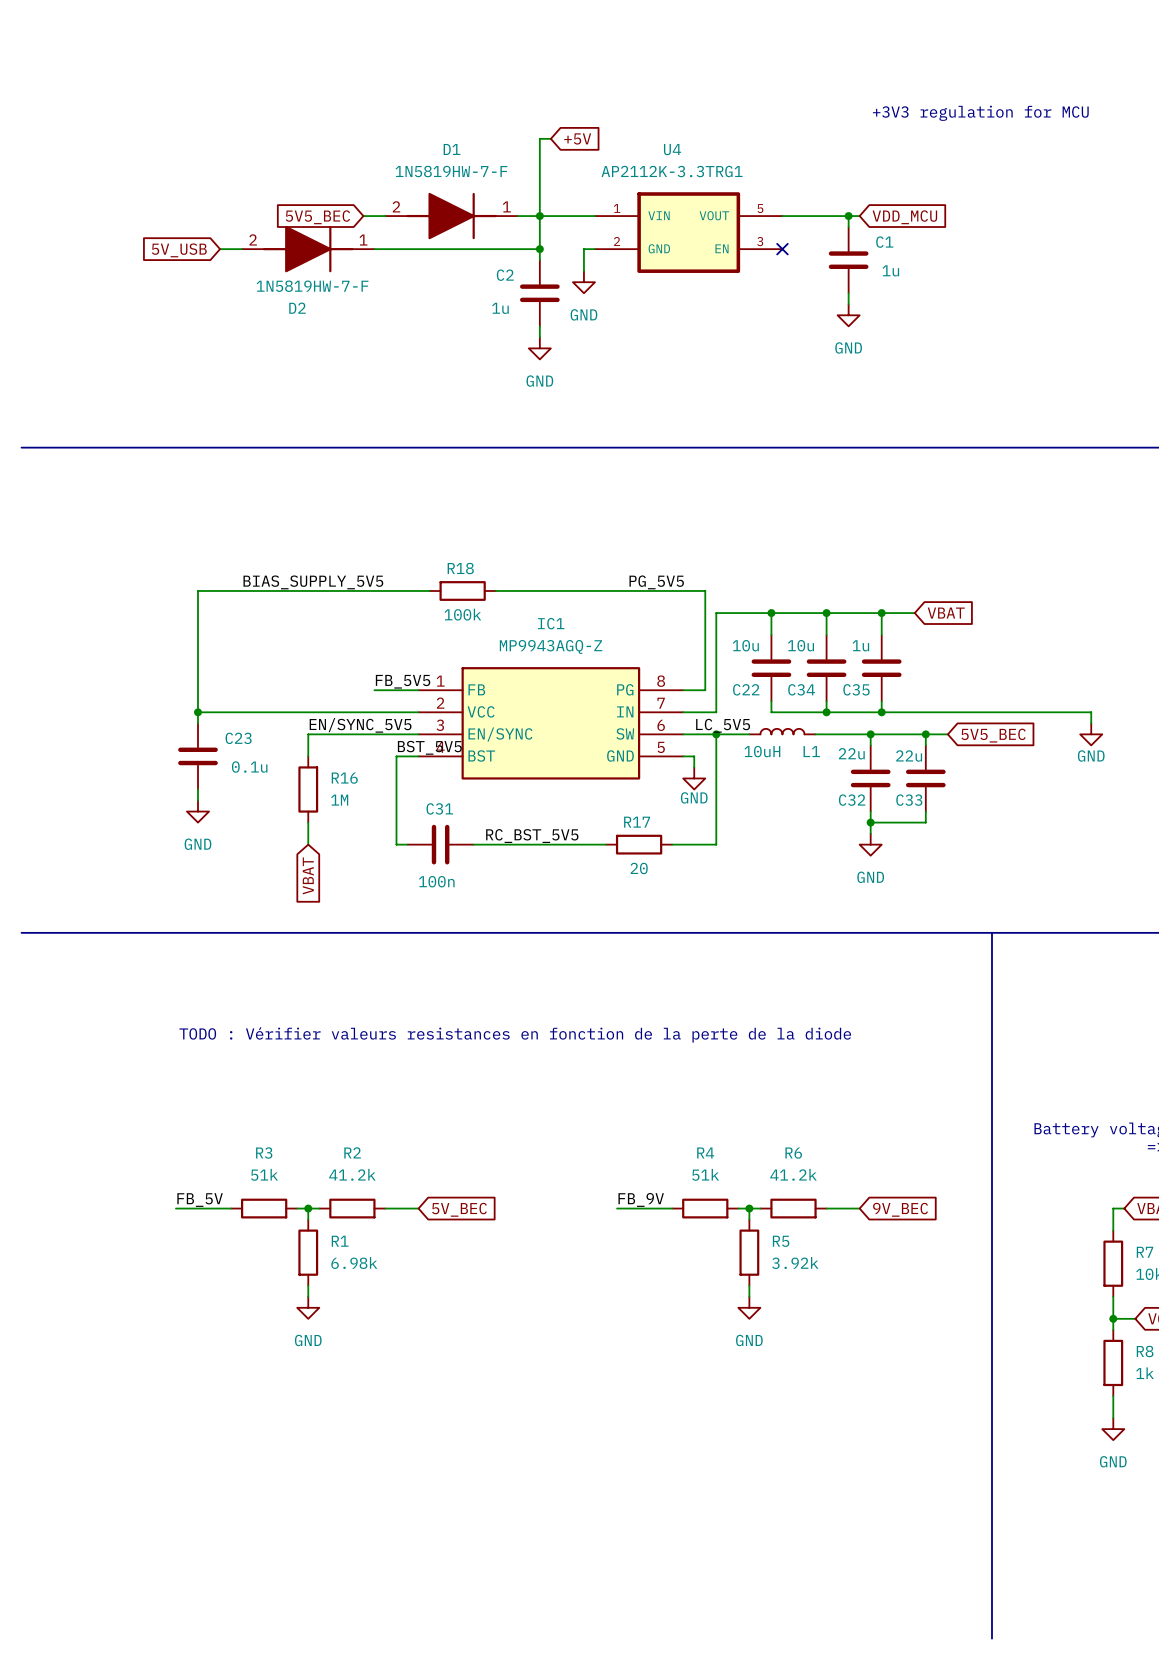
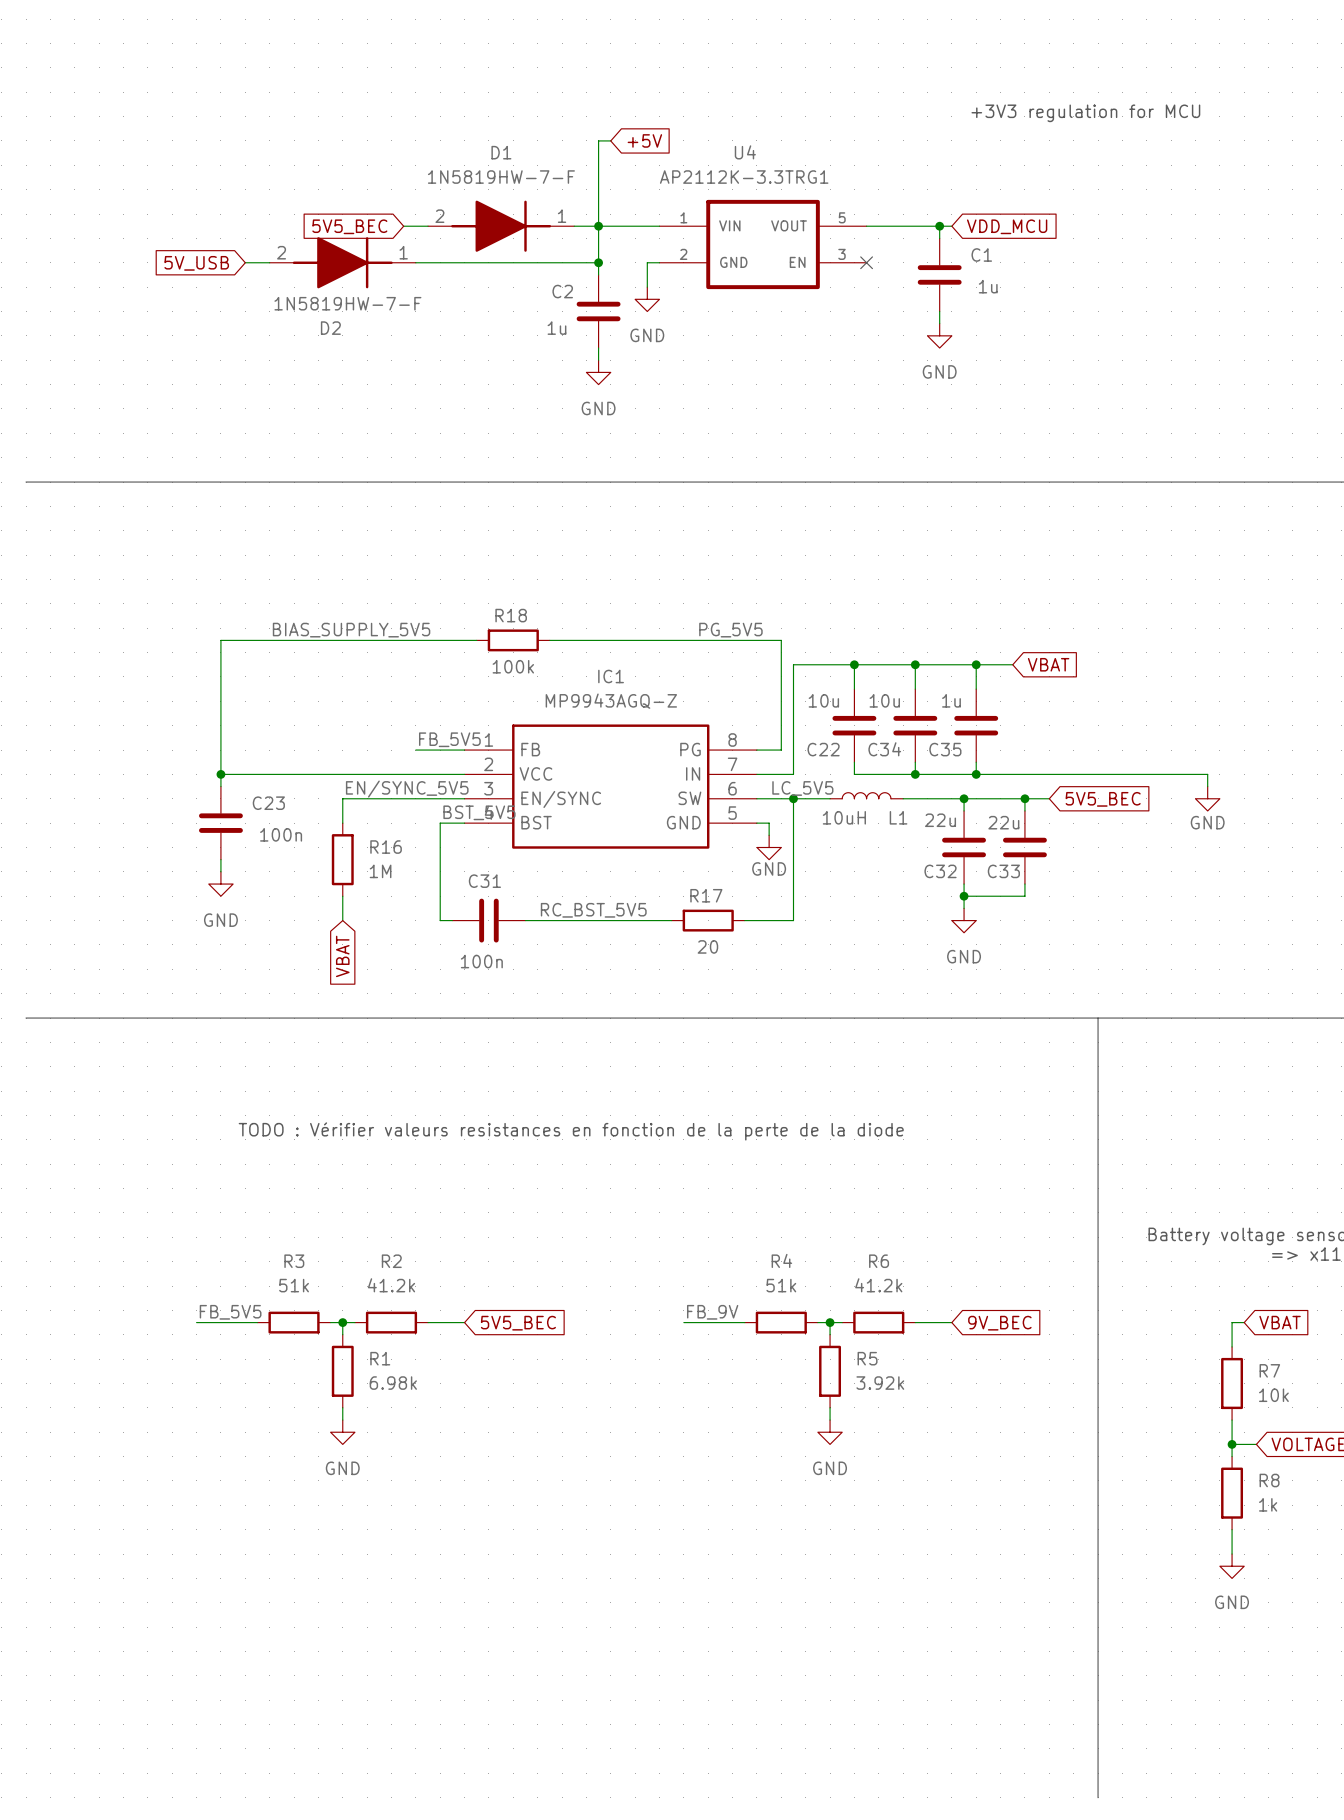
C23 value: 0.1u (249, 767) -> 100n (281, 834)
label: FB_5V (200, 1200) -> FB_5V5 (230, 1312)
global label: 5V_BEC (459, 1209) -> 5V5_BEC (518, 1323)

